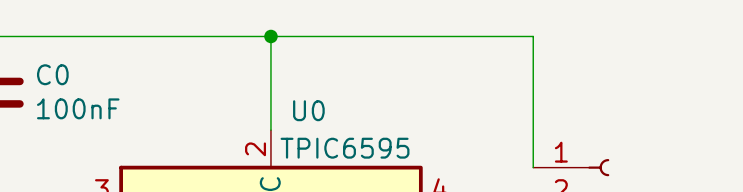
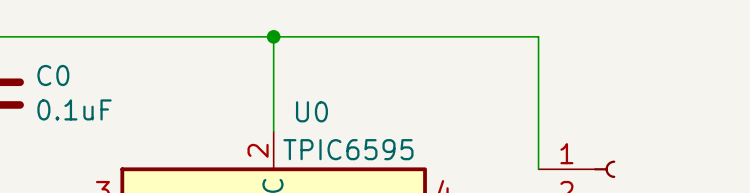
C0 value: 100nF (78, 108) -> 0.1uF (74, 109)

